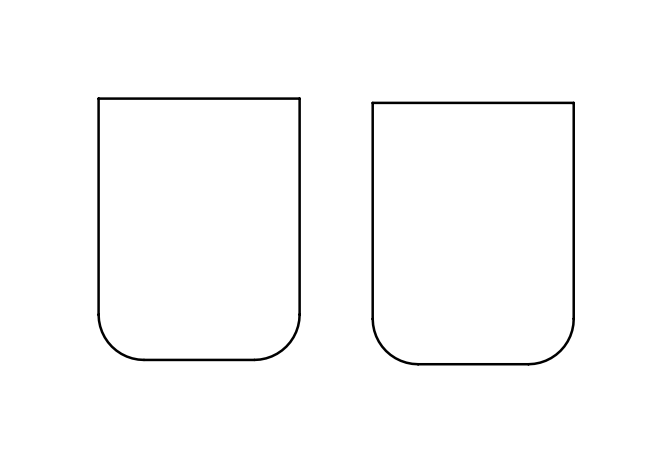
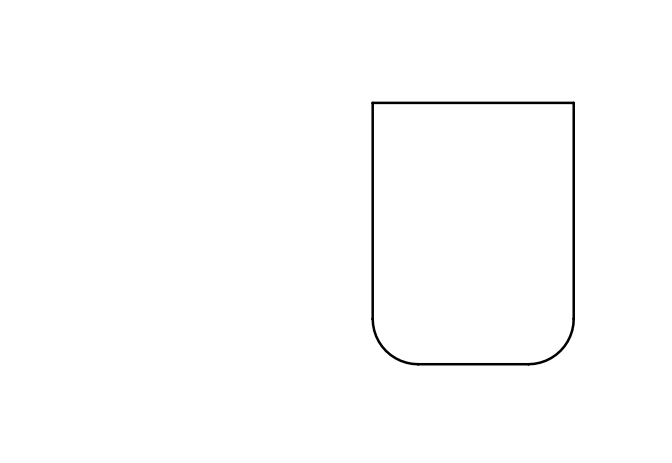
board edge: (299, 98) (98, 98) (99, 320) (104, 337) (116, 350) (126, 356) (138, 359) (254, 359) (271, 356) (281, 350) (290, 342) (298, 326) (299, 314) (299, 98) -> none

